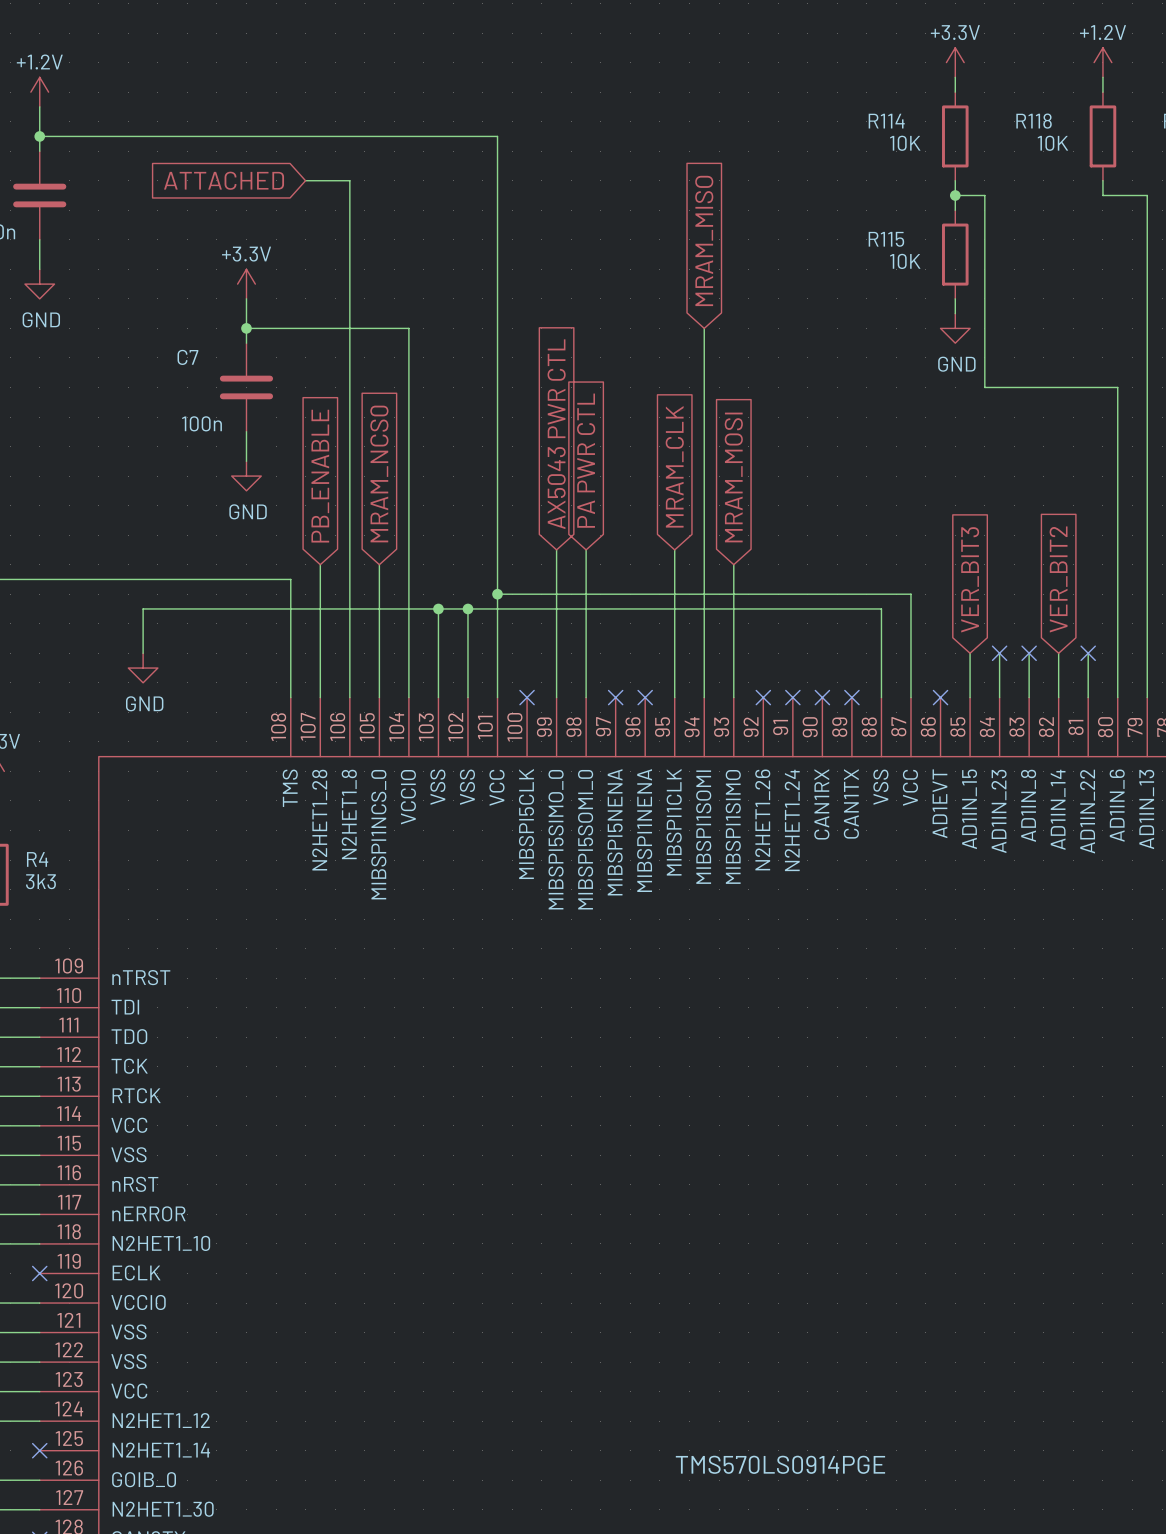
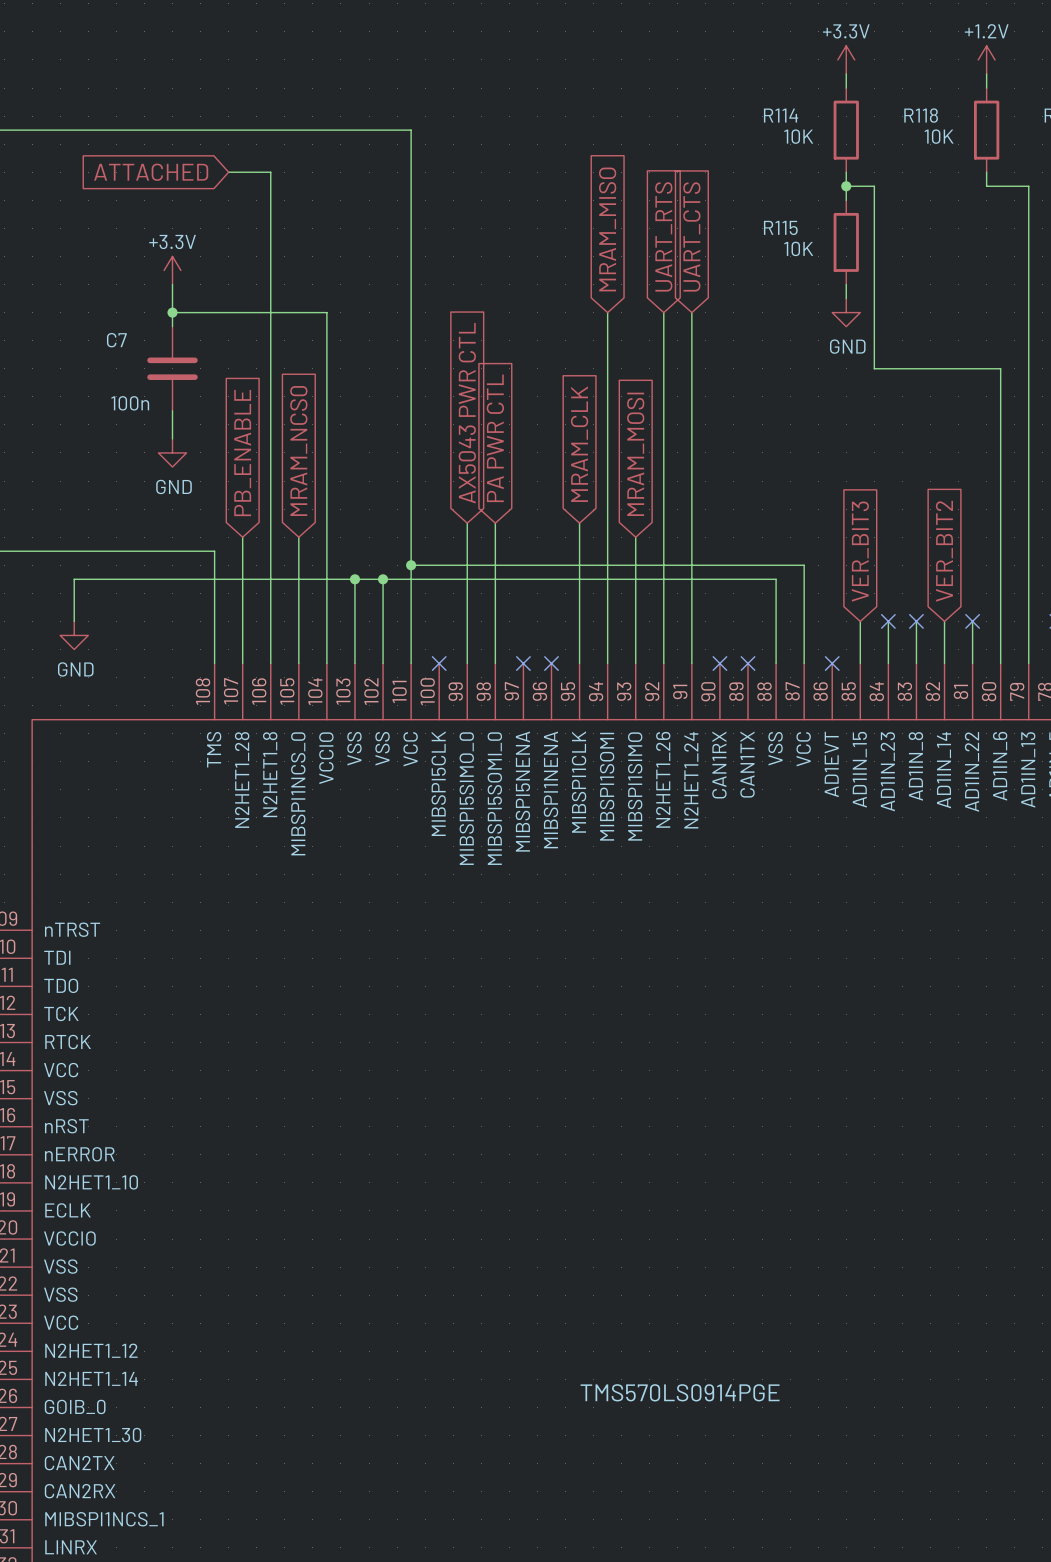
global label: none -> UART_RTS (663, 236)
global label: none -> UART_CTS (691, 236)
wire: none -> (663, 312) (663, 663)
wire: none -> (691, 312) (691, 663)
no-connect mark: (763, 697) -> none
no-connect mark: (792, 697) -> none

